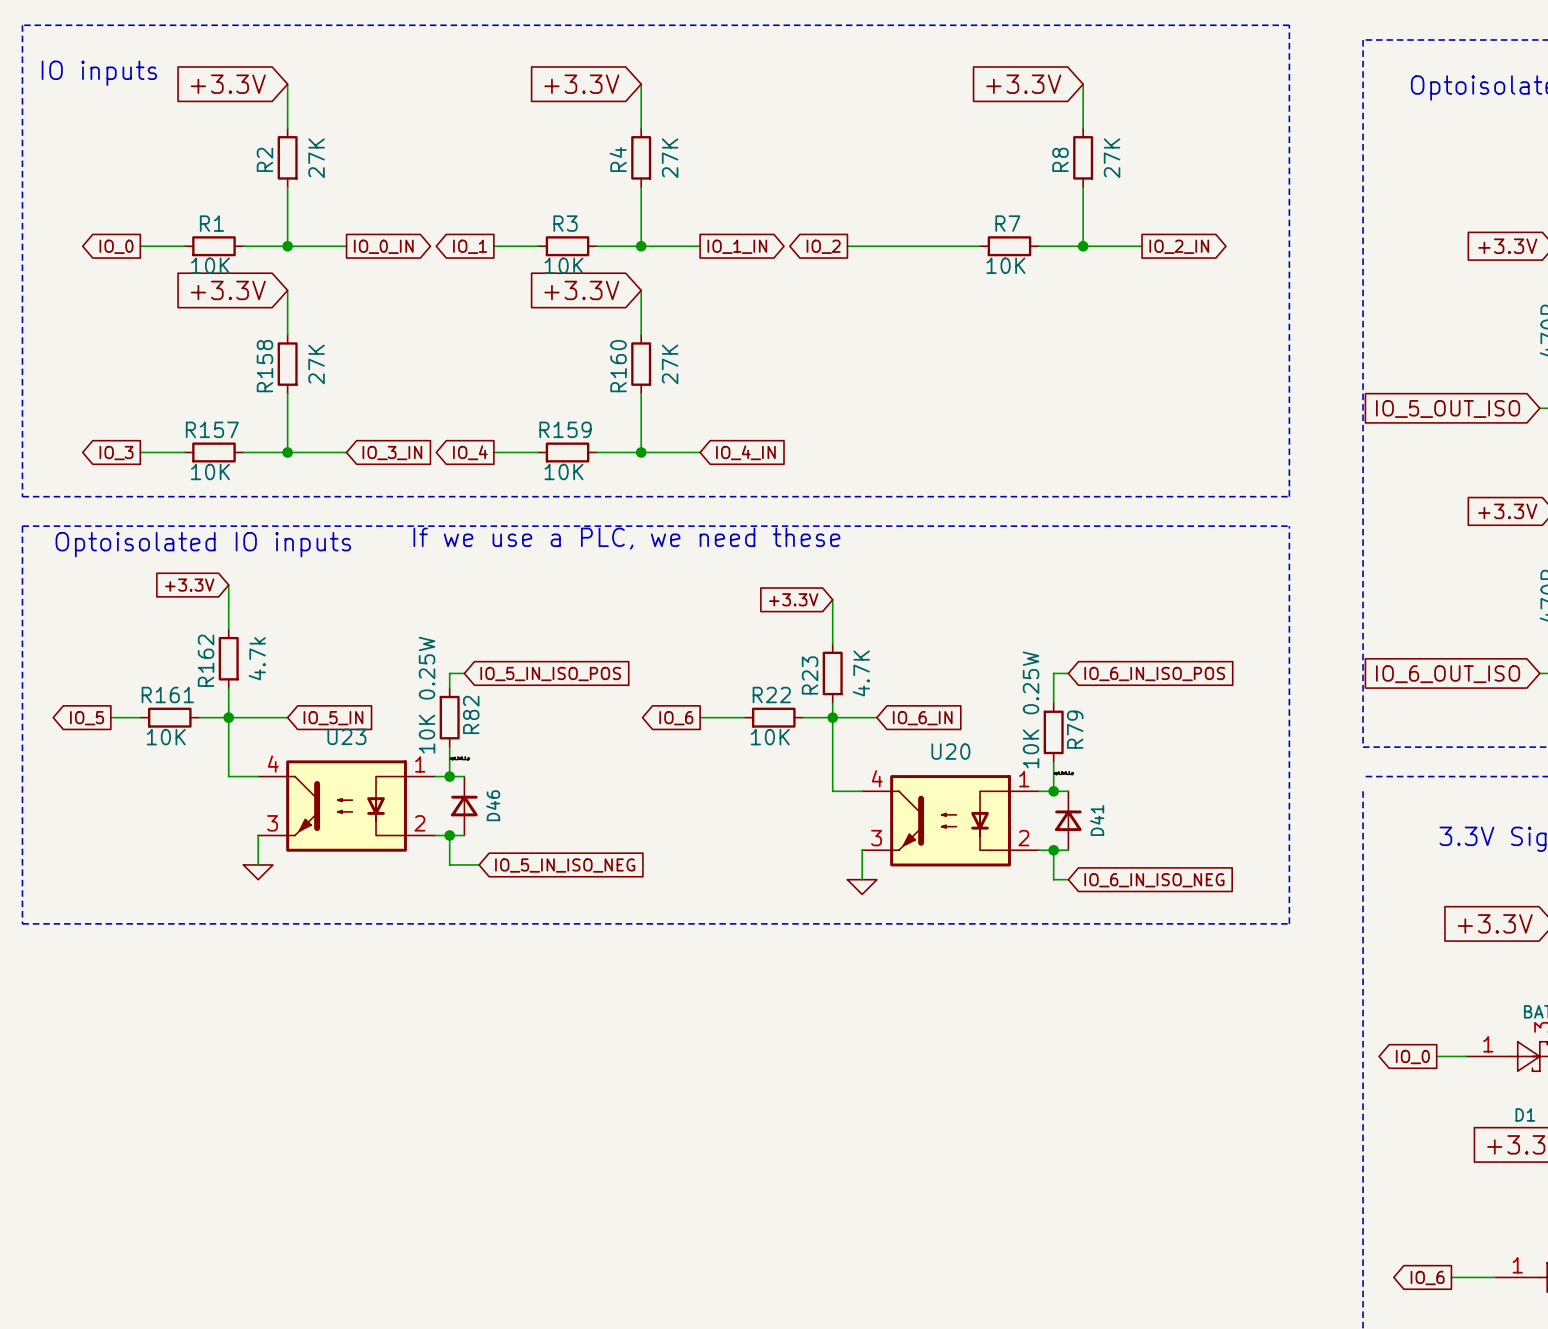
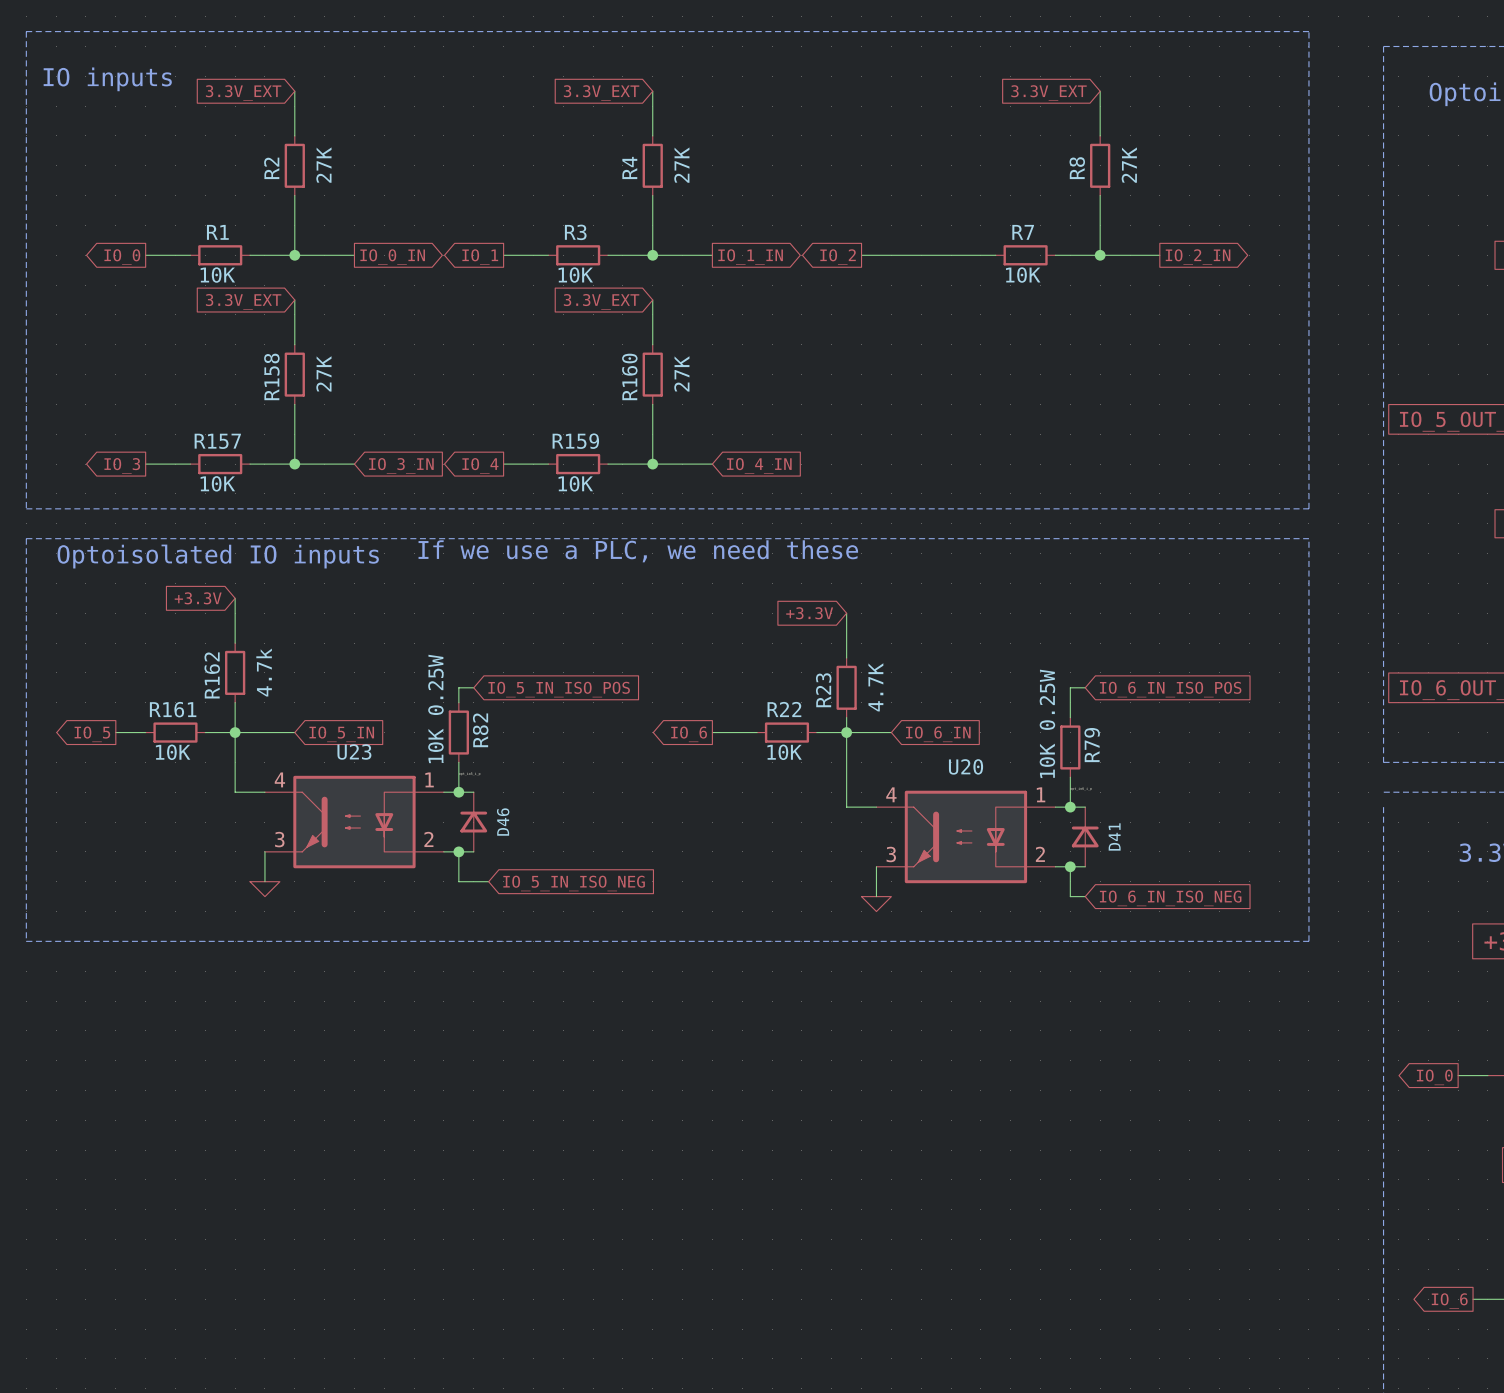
global label: +3.3V (228, 84) -> 3.3V_EXT (243, 93)
global label: +3.3V (581, 84) -> 3.3V_EXT (601, 93)
global label: +3.3V (1023, 84) -> 3.3V_EXT (1049, 93)
global label: +3.3V (228, 290) -> 3.3V_EXT (243, 301)
global label: +3.3V (581, 290) -> 3.3V_EXT (601, 301)

